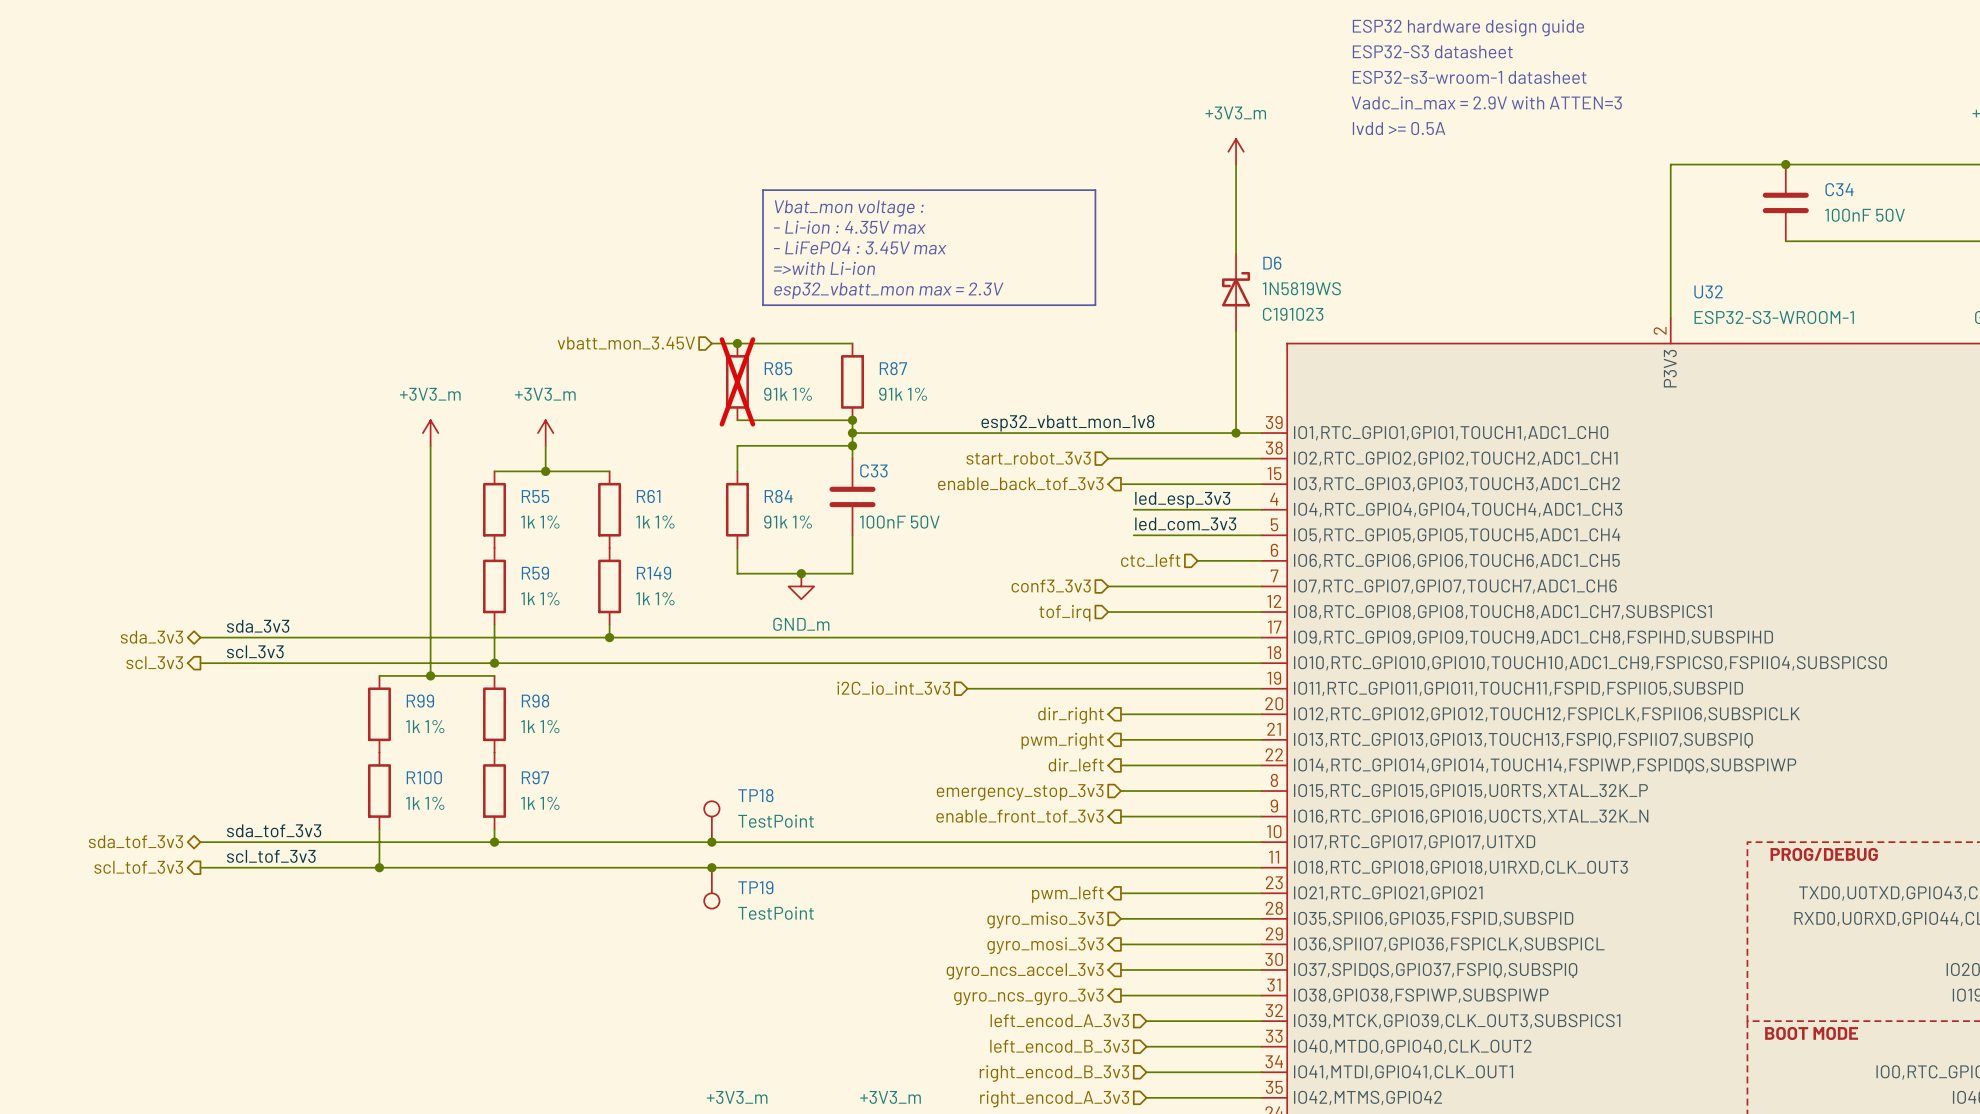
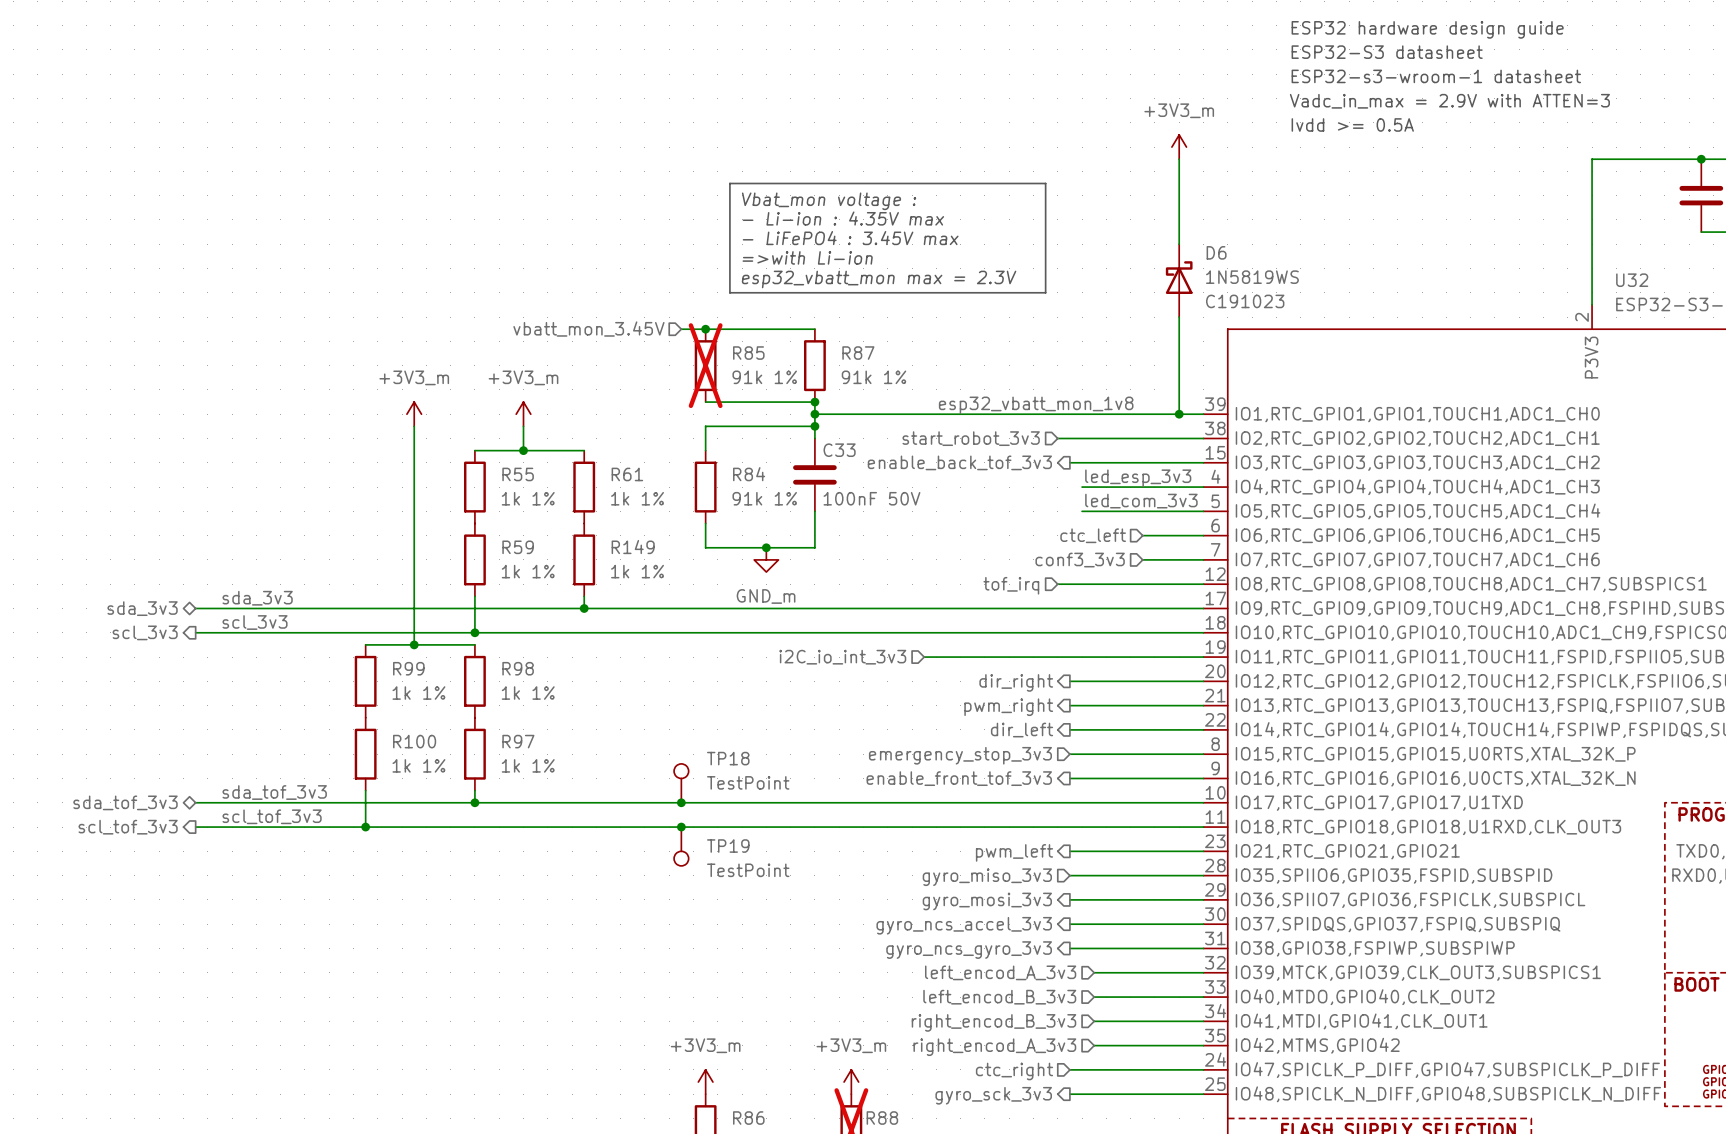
hierarchical label position: conf3_3v3 (1051, 586) -> conf3_3v3 (1080, 560)
wire: (1108, 586) (1197, 586) -> none

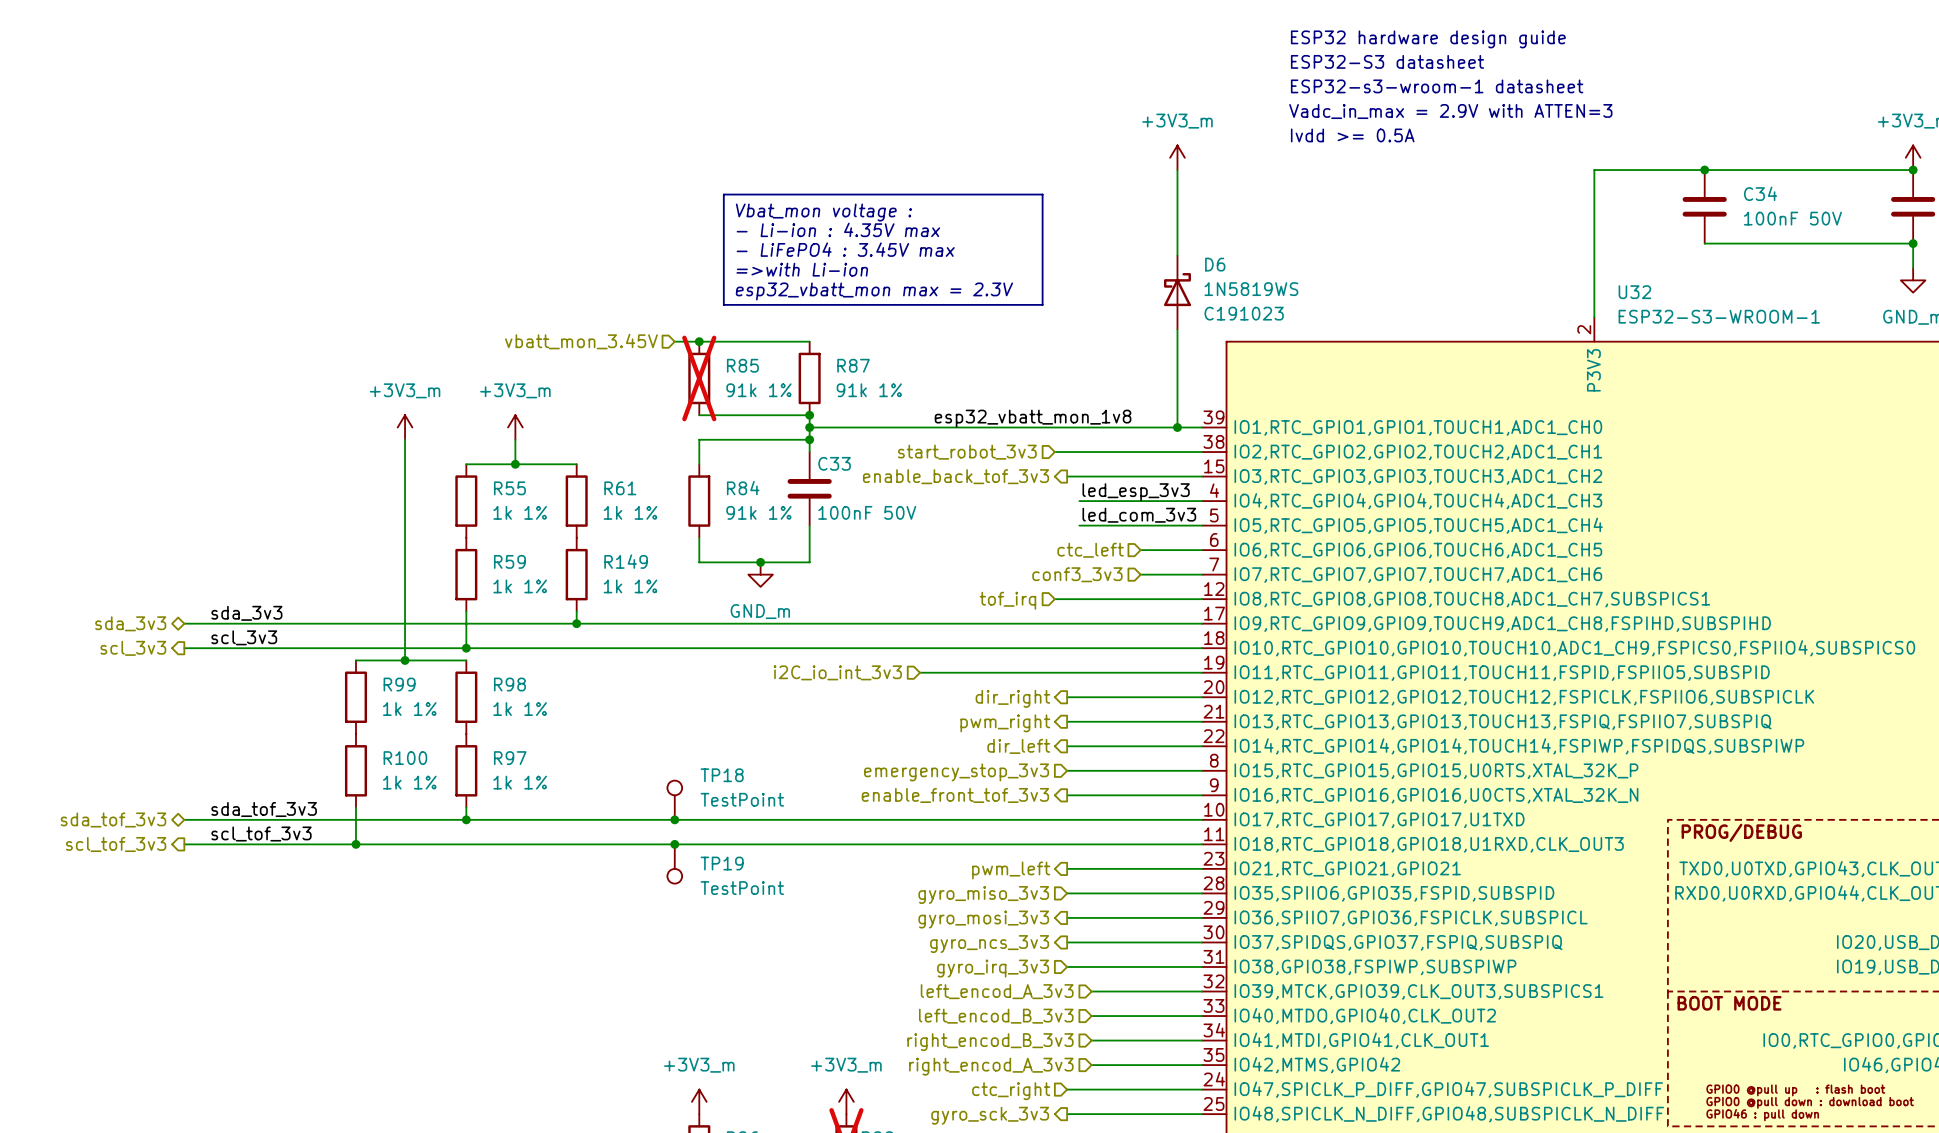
hierarchical label: gyro_ncs_accel_3v3 (964, 925) -> gyro_ncs_3v3 (989, 944)
hierarchical label shape: output (969, 950) -> input (993, 968)
hierarchical label: gyro_ncs_gyro_3v3 (969, 950) -> gyro_irq_3v3 (993, 968)

